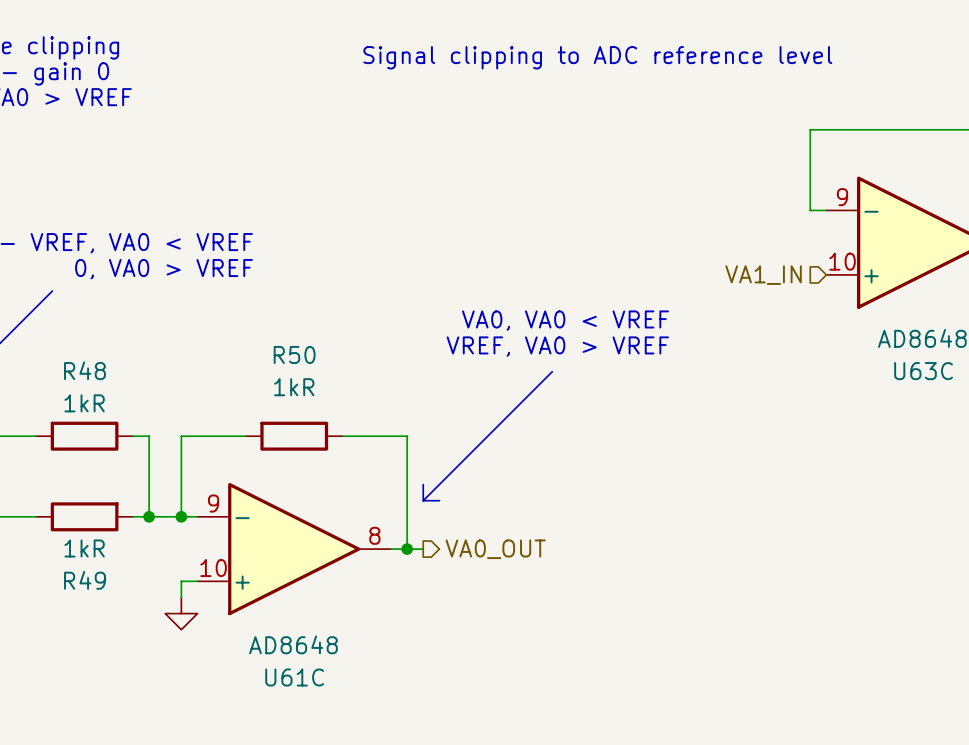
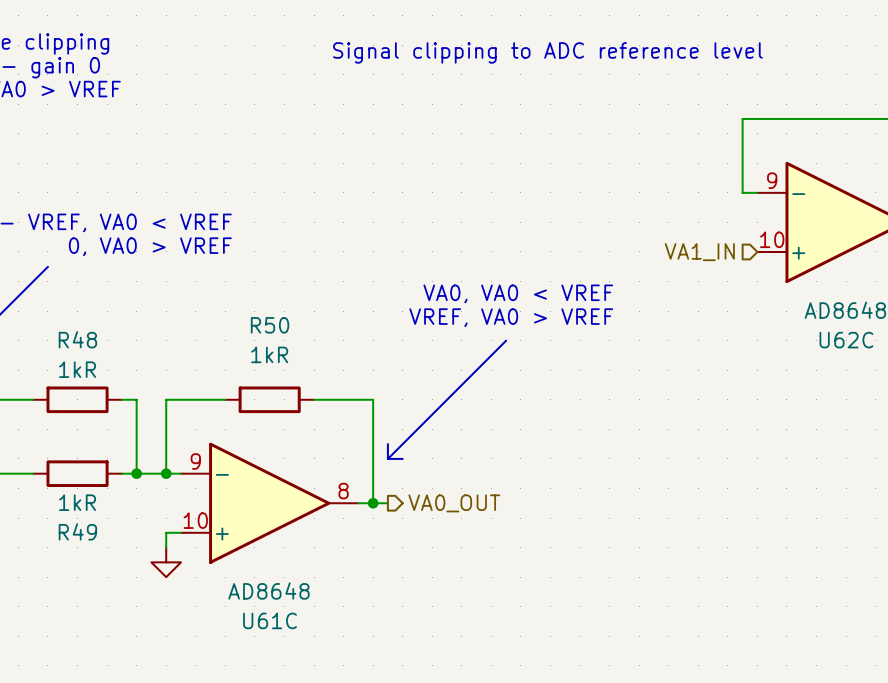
U63C name: U63C (923, 371) -> U62C (846, 340)

